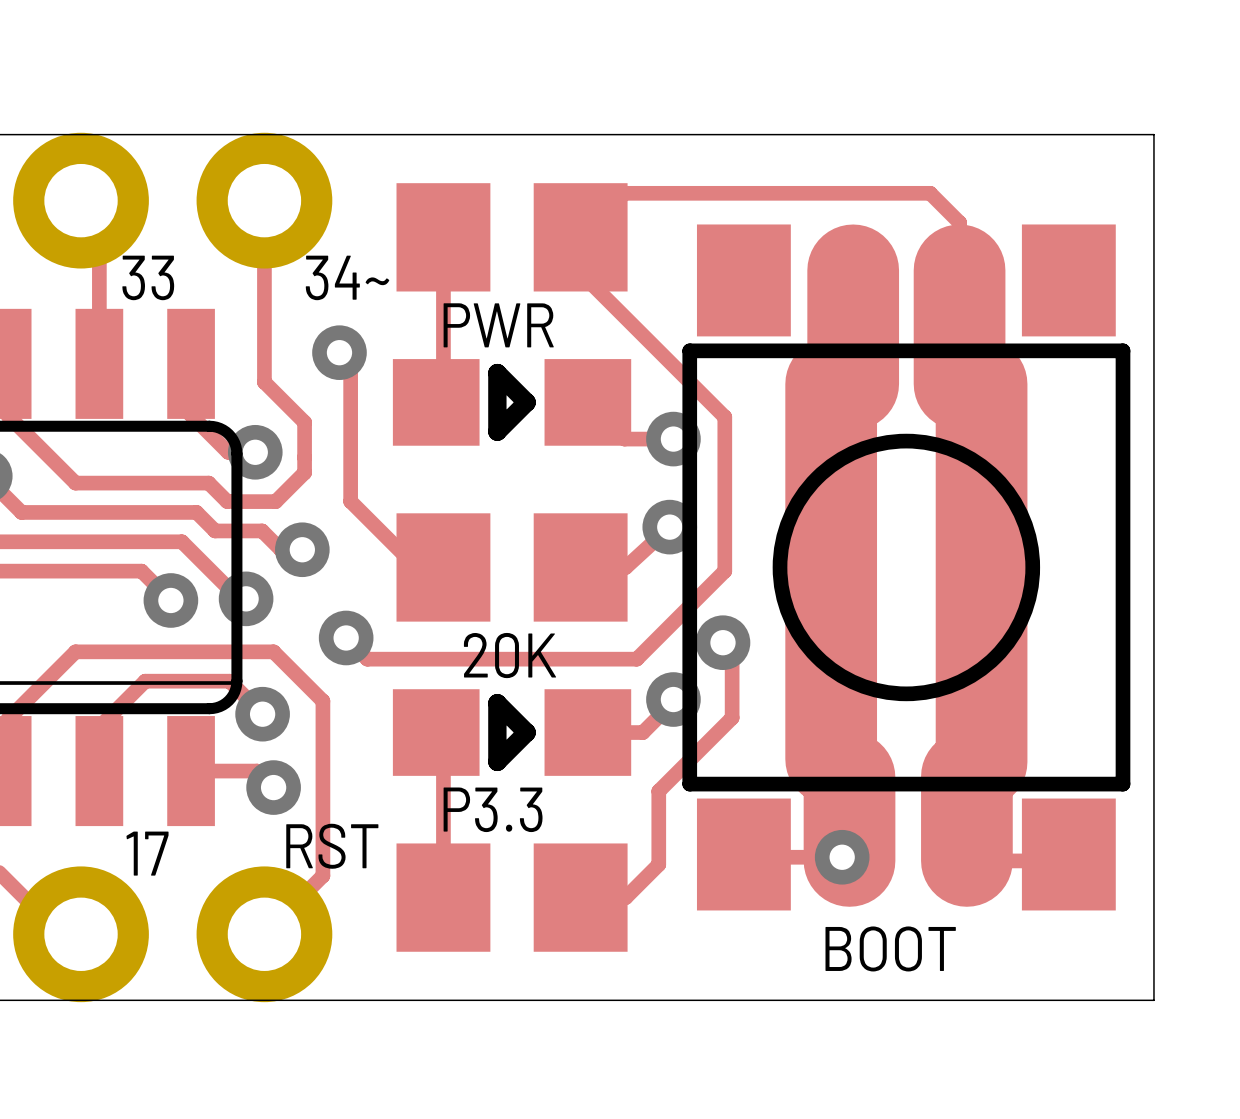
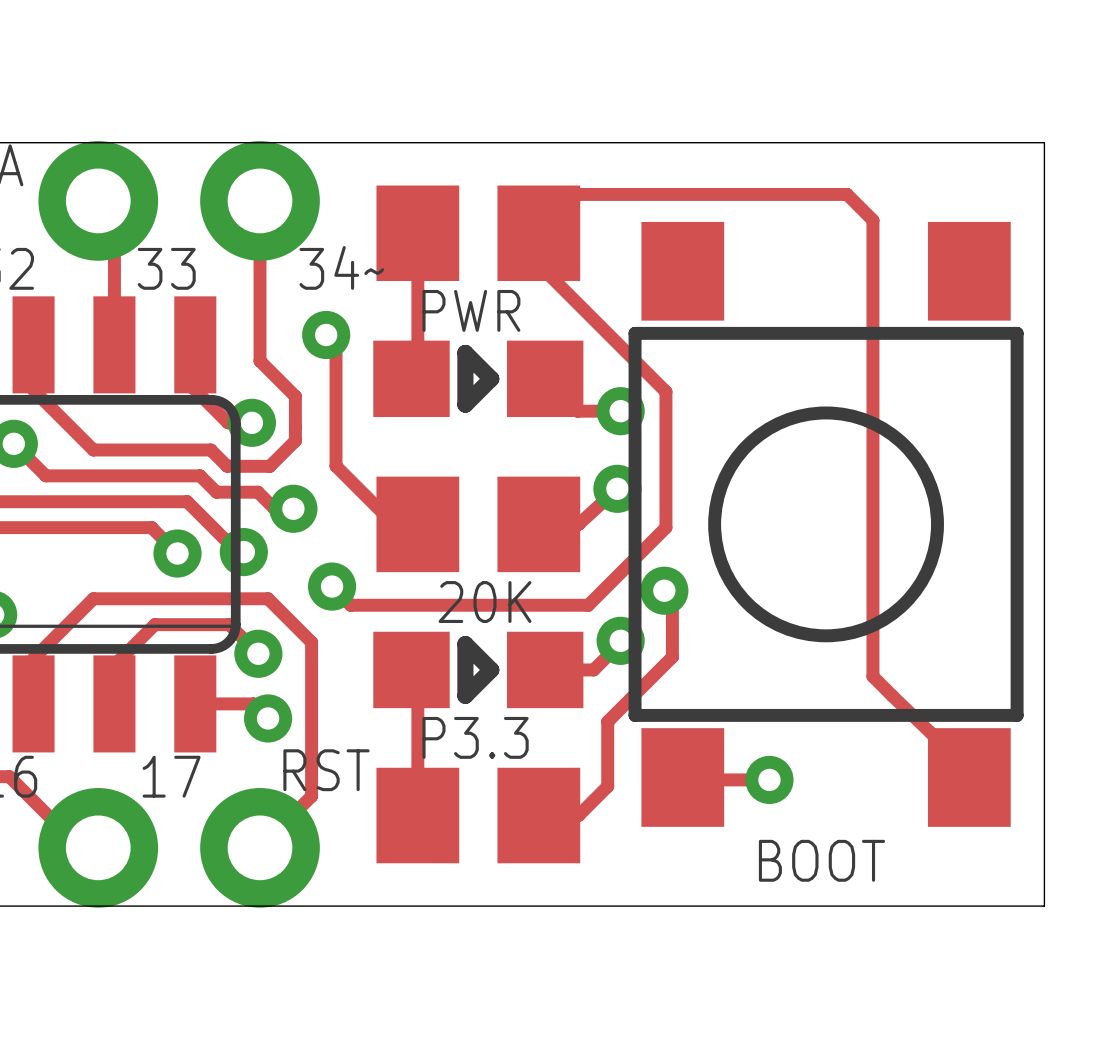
track: (853, 270) (853, 384) (831, 384) (831, 759) (849, 777) (849, 860) (845, 857) (842, 857) -> none
track width: thick (959, 270) (959, 384) -> thin (872, 262) (872, 362)
track: (959, 384) (981, 384) (981, 762) (977, 758) (977, 765) (966, 776) (966, 860) (1062, 860) (1068, 854) -> (872, 362) (872, 676) (969, 770) (969, 777)

